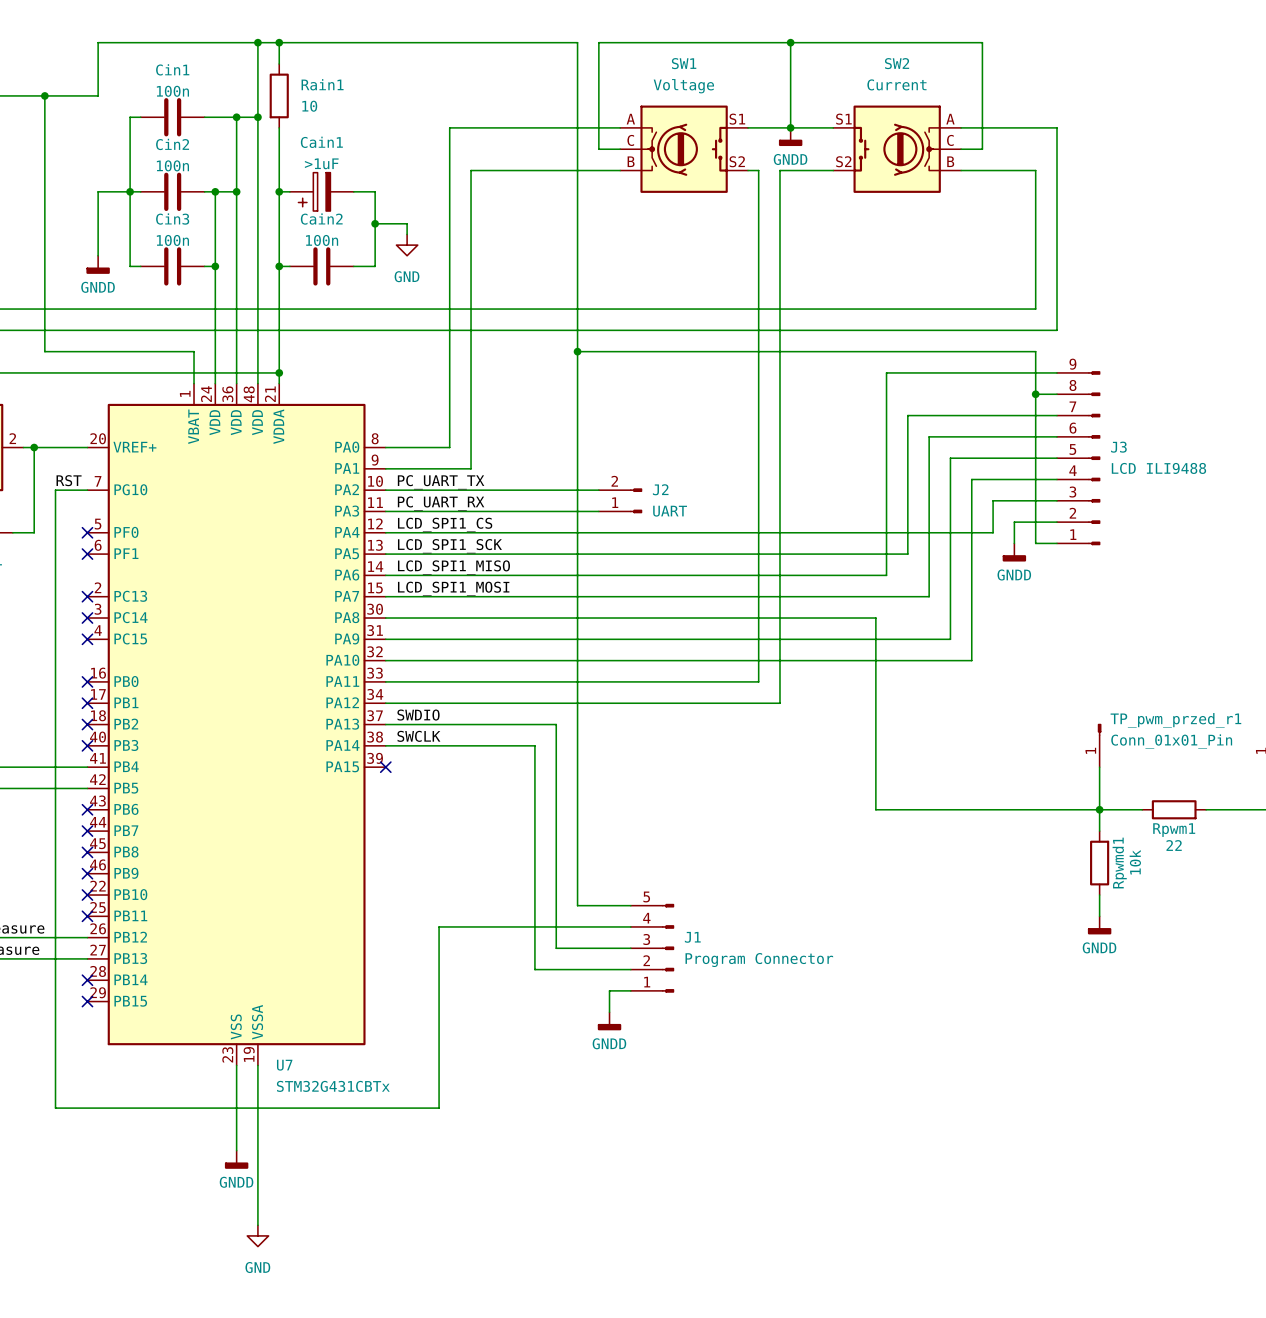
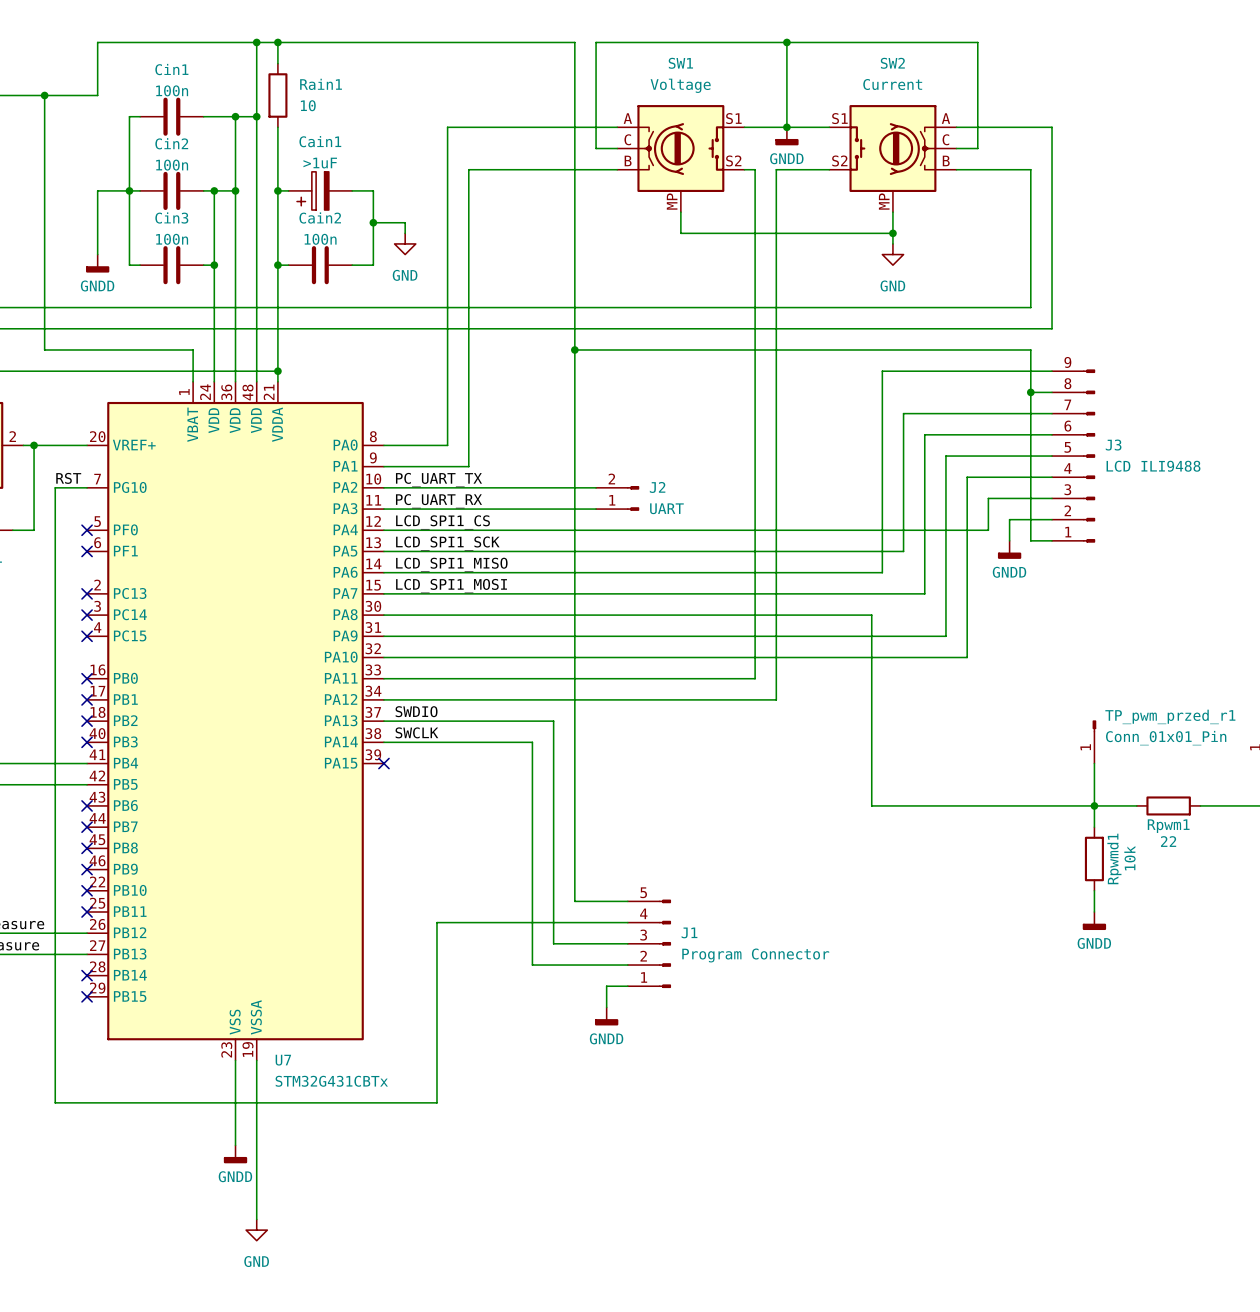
SW1 symbol: [620, 105, 749, 193] -> [617, 105, 745, 213]
SW2 symbol: [833, 105, 962, 193] -> [829, 105, 957, 213]
wire: none -> (680, 212) (680, 233) (892, 233)
wire: none -> (892, 212) (892, 243)
junction: none -> (892, 233)
power symbol: none -> GND (892, 254)

